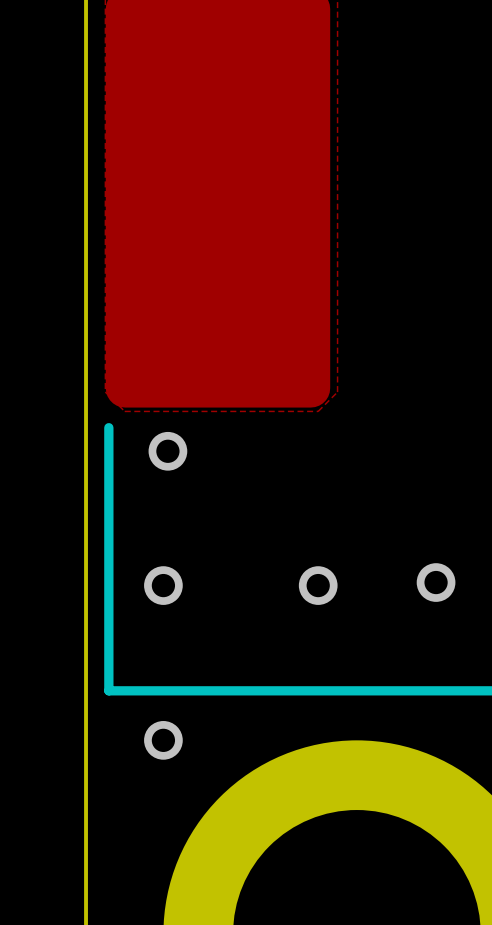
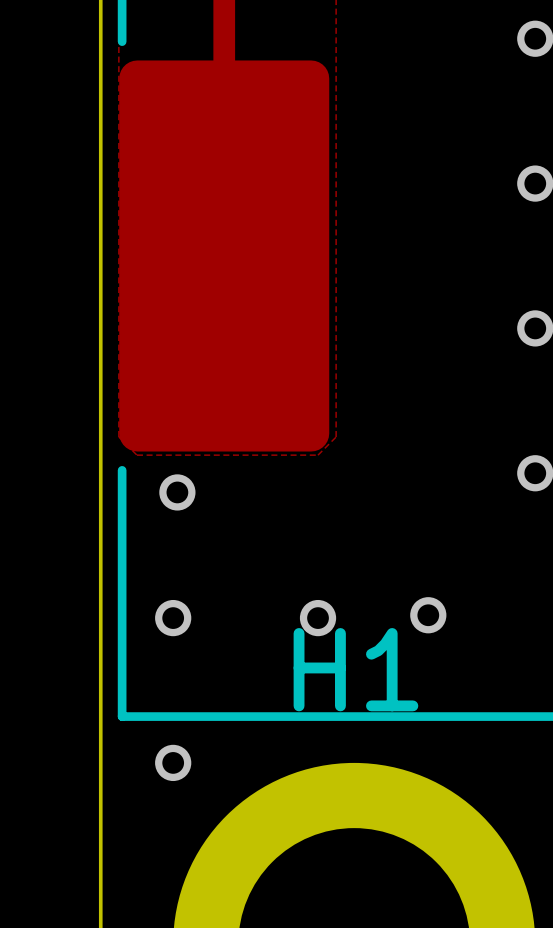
H1 name: none -> H1 (355, 669)

